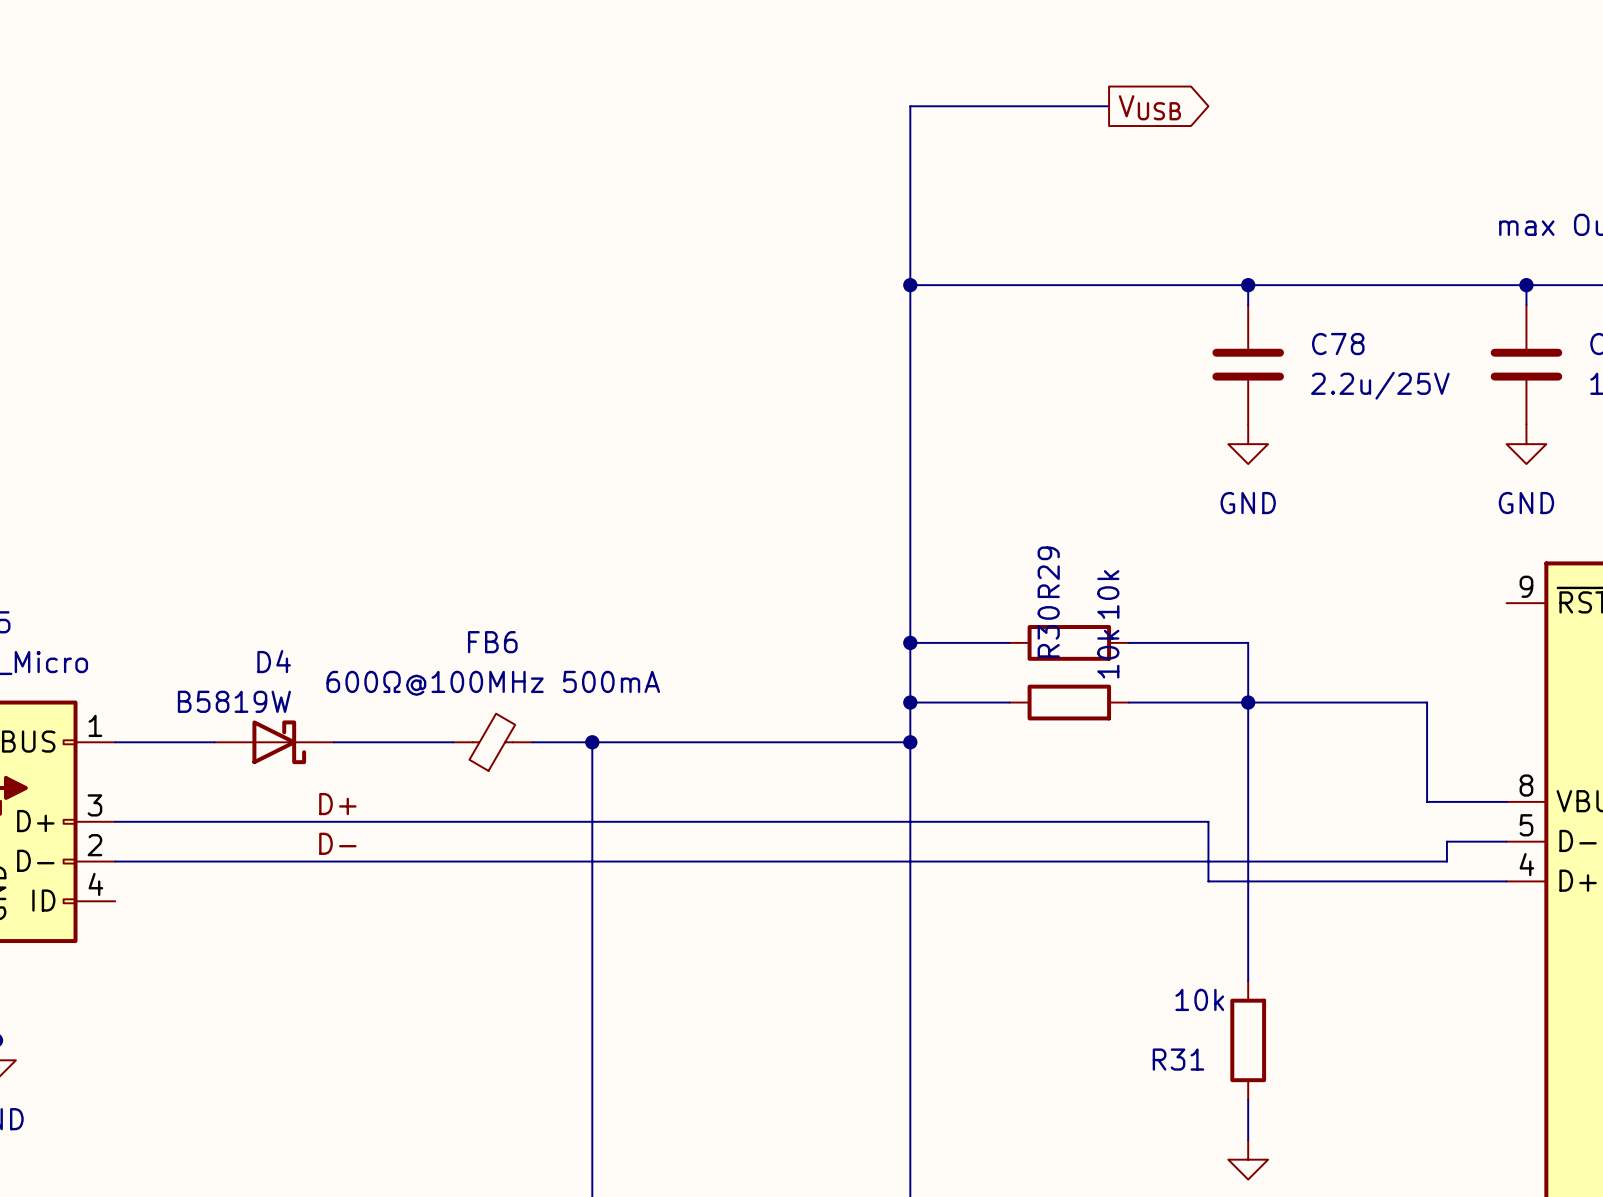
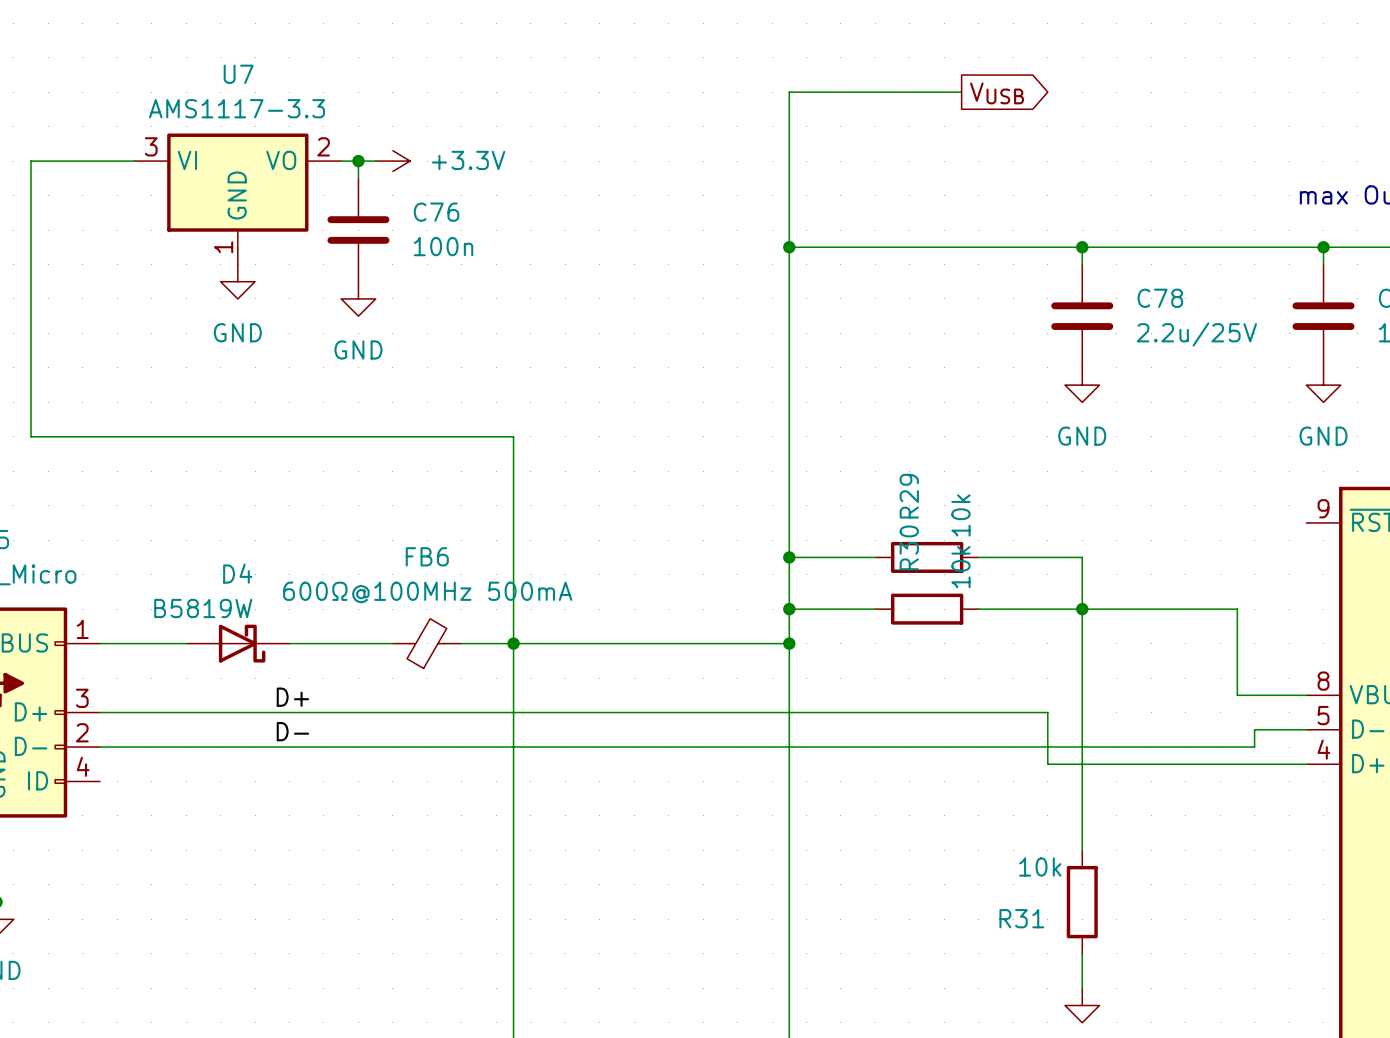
wire: none -> (134, 161) (31, 161) (31, 436) (513, 436) (513, 643)
wire: none -> (341, 161) (375, 161)
wire: none -> (358, 161) (358, 178)
junction: none -> (358, 161)
power symbol: none -> +3.3V (392, 161)
U7: none -> AMS1117-3.3 (237, 198)
C76: none -> 100n (358, 230)
power symbol: none -> GND (237, 281)
power symbol: none -> GND (358, 298)

